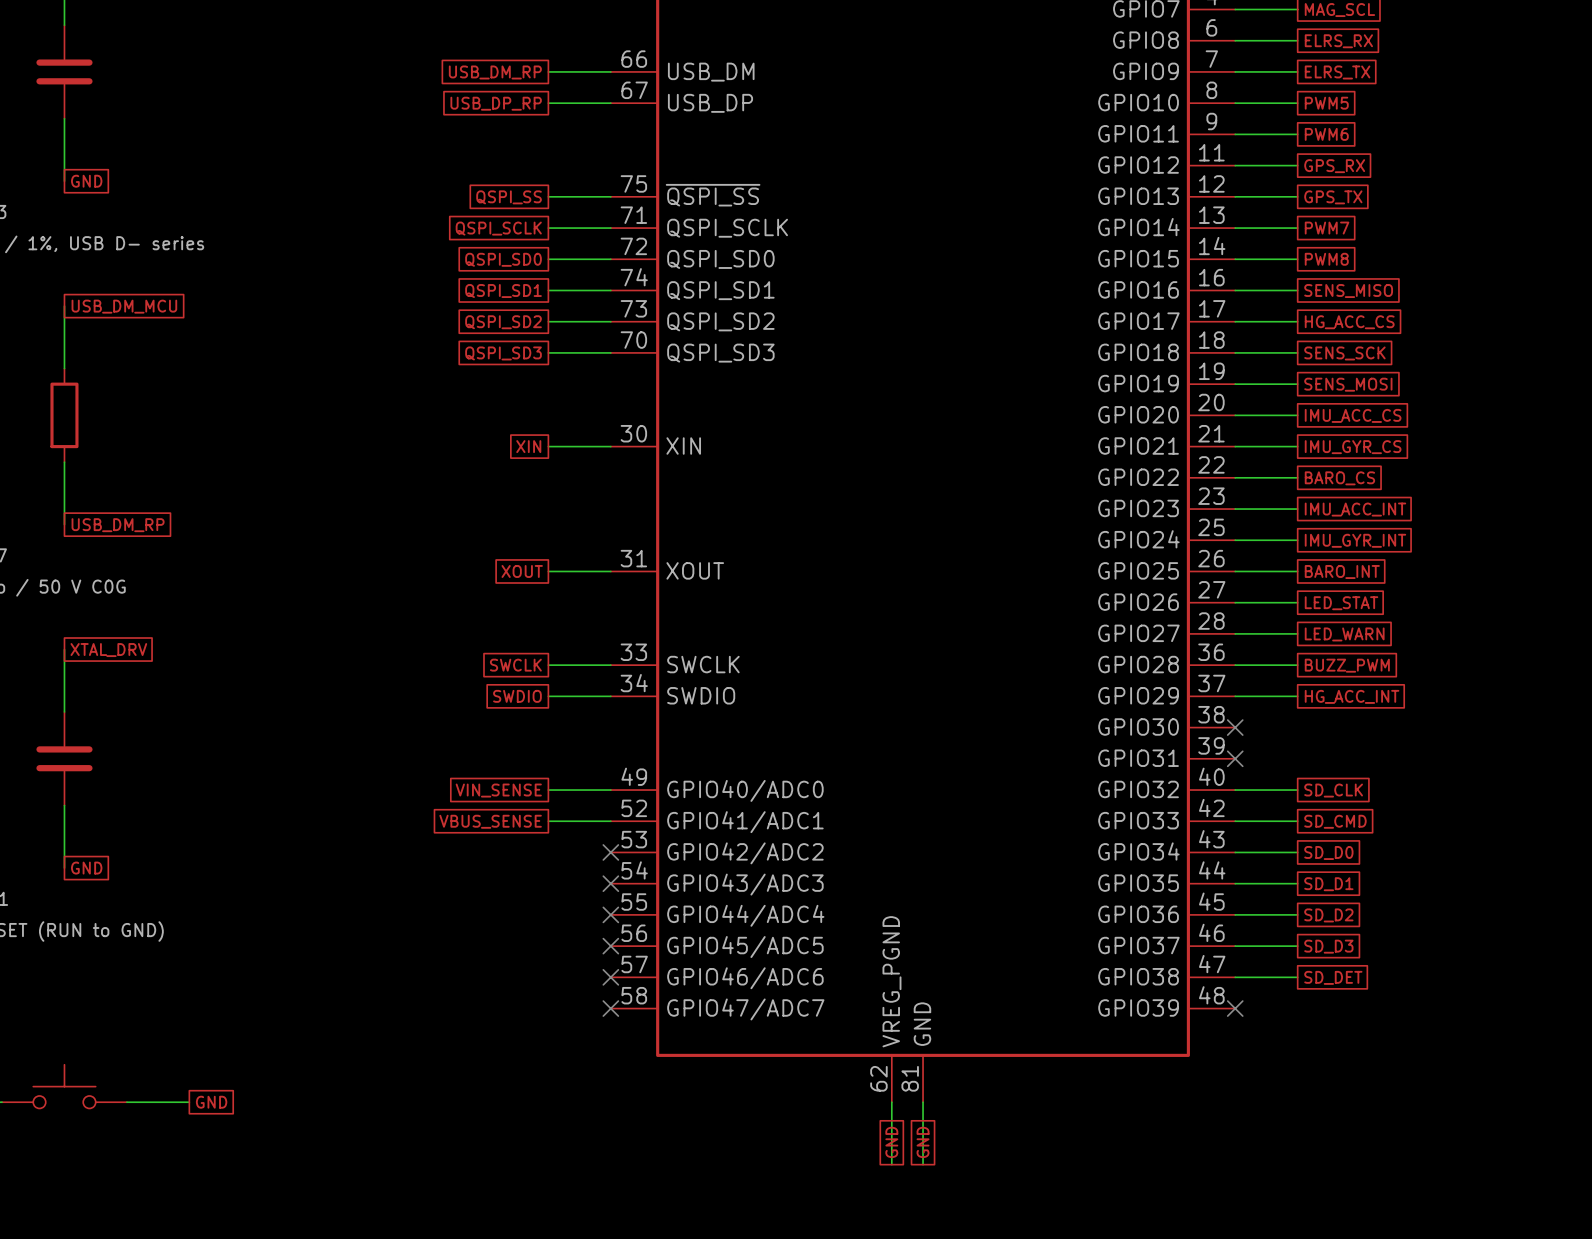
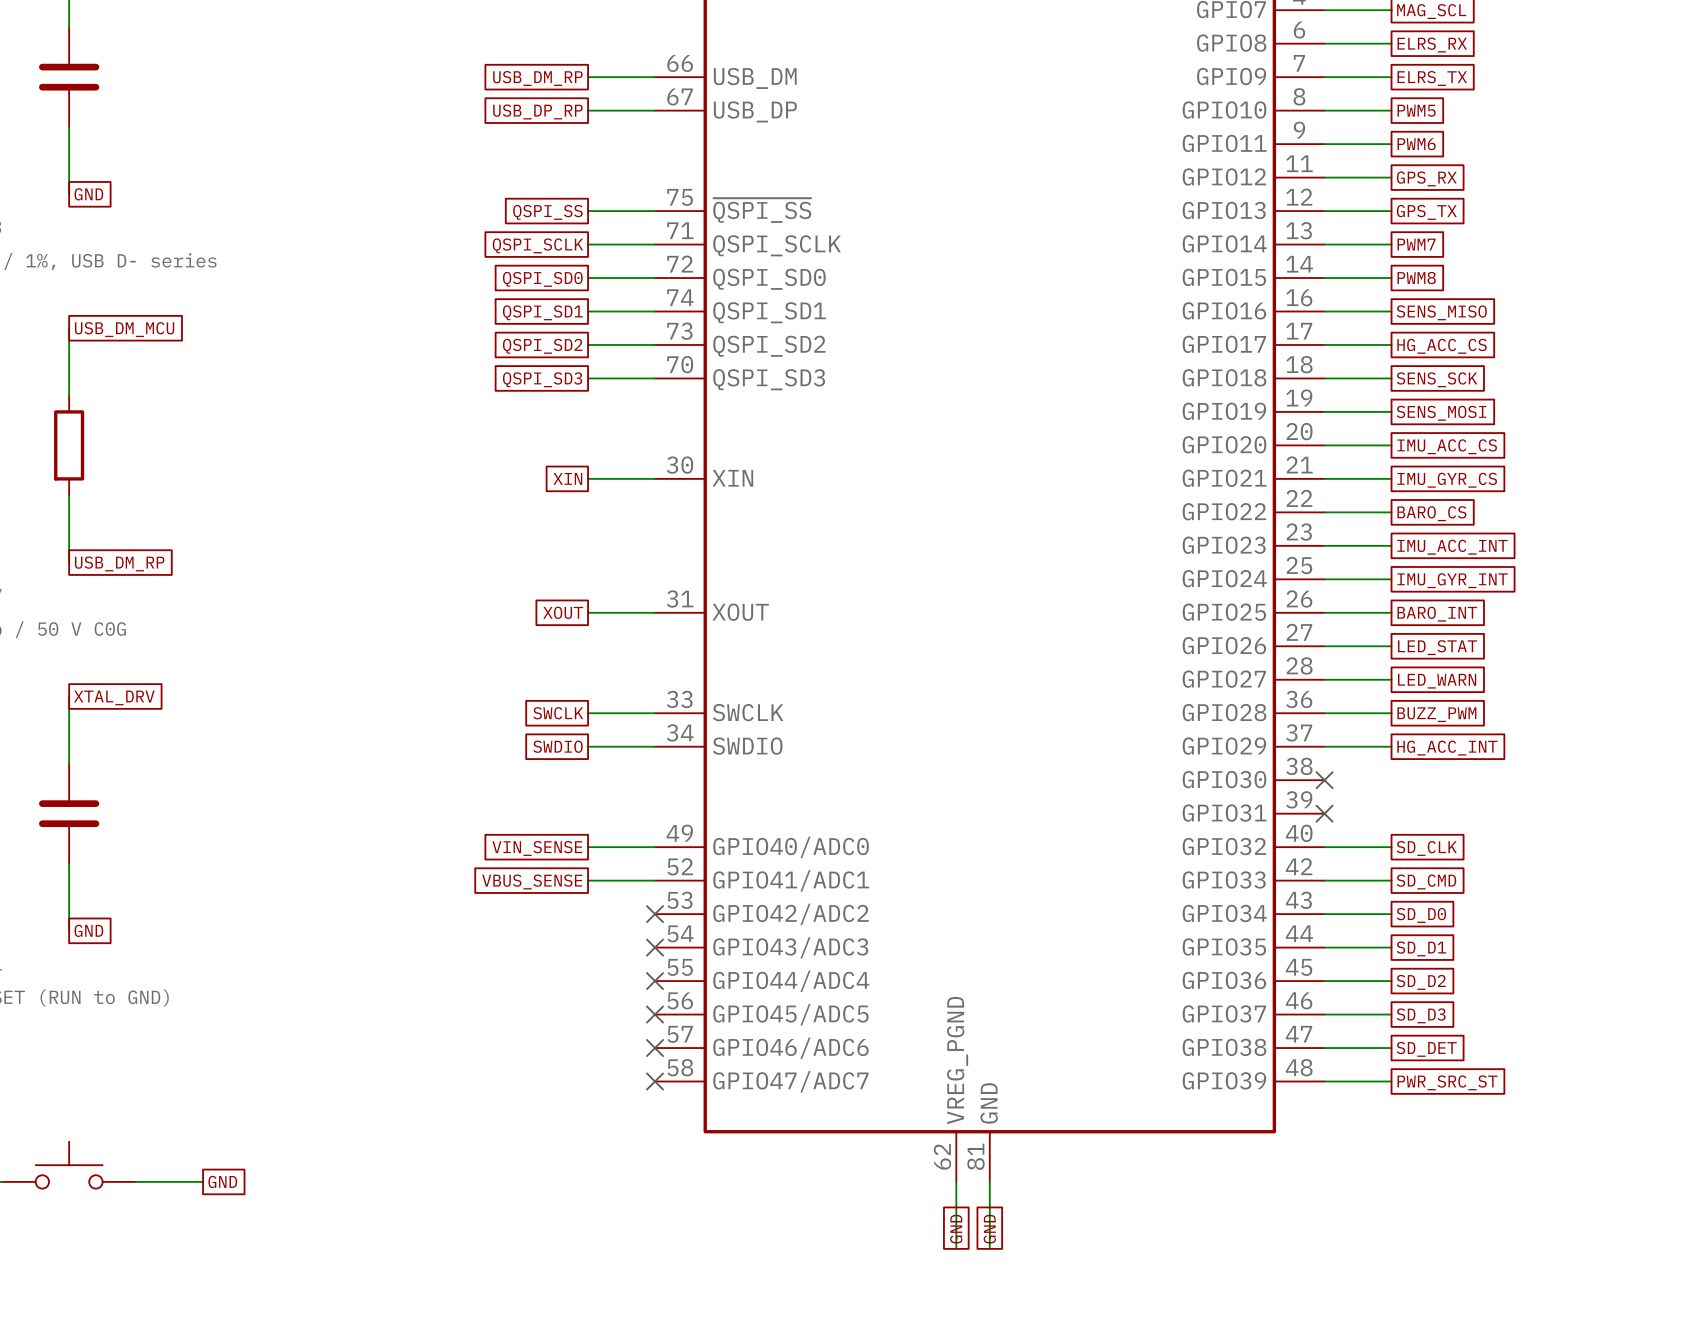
wire: none -> (1324, 1081) (1391, 1081)
no-connect mark: (1235, 1008) -> none
global label: none -> PWR_SRC_ST (1447, 1082)

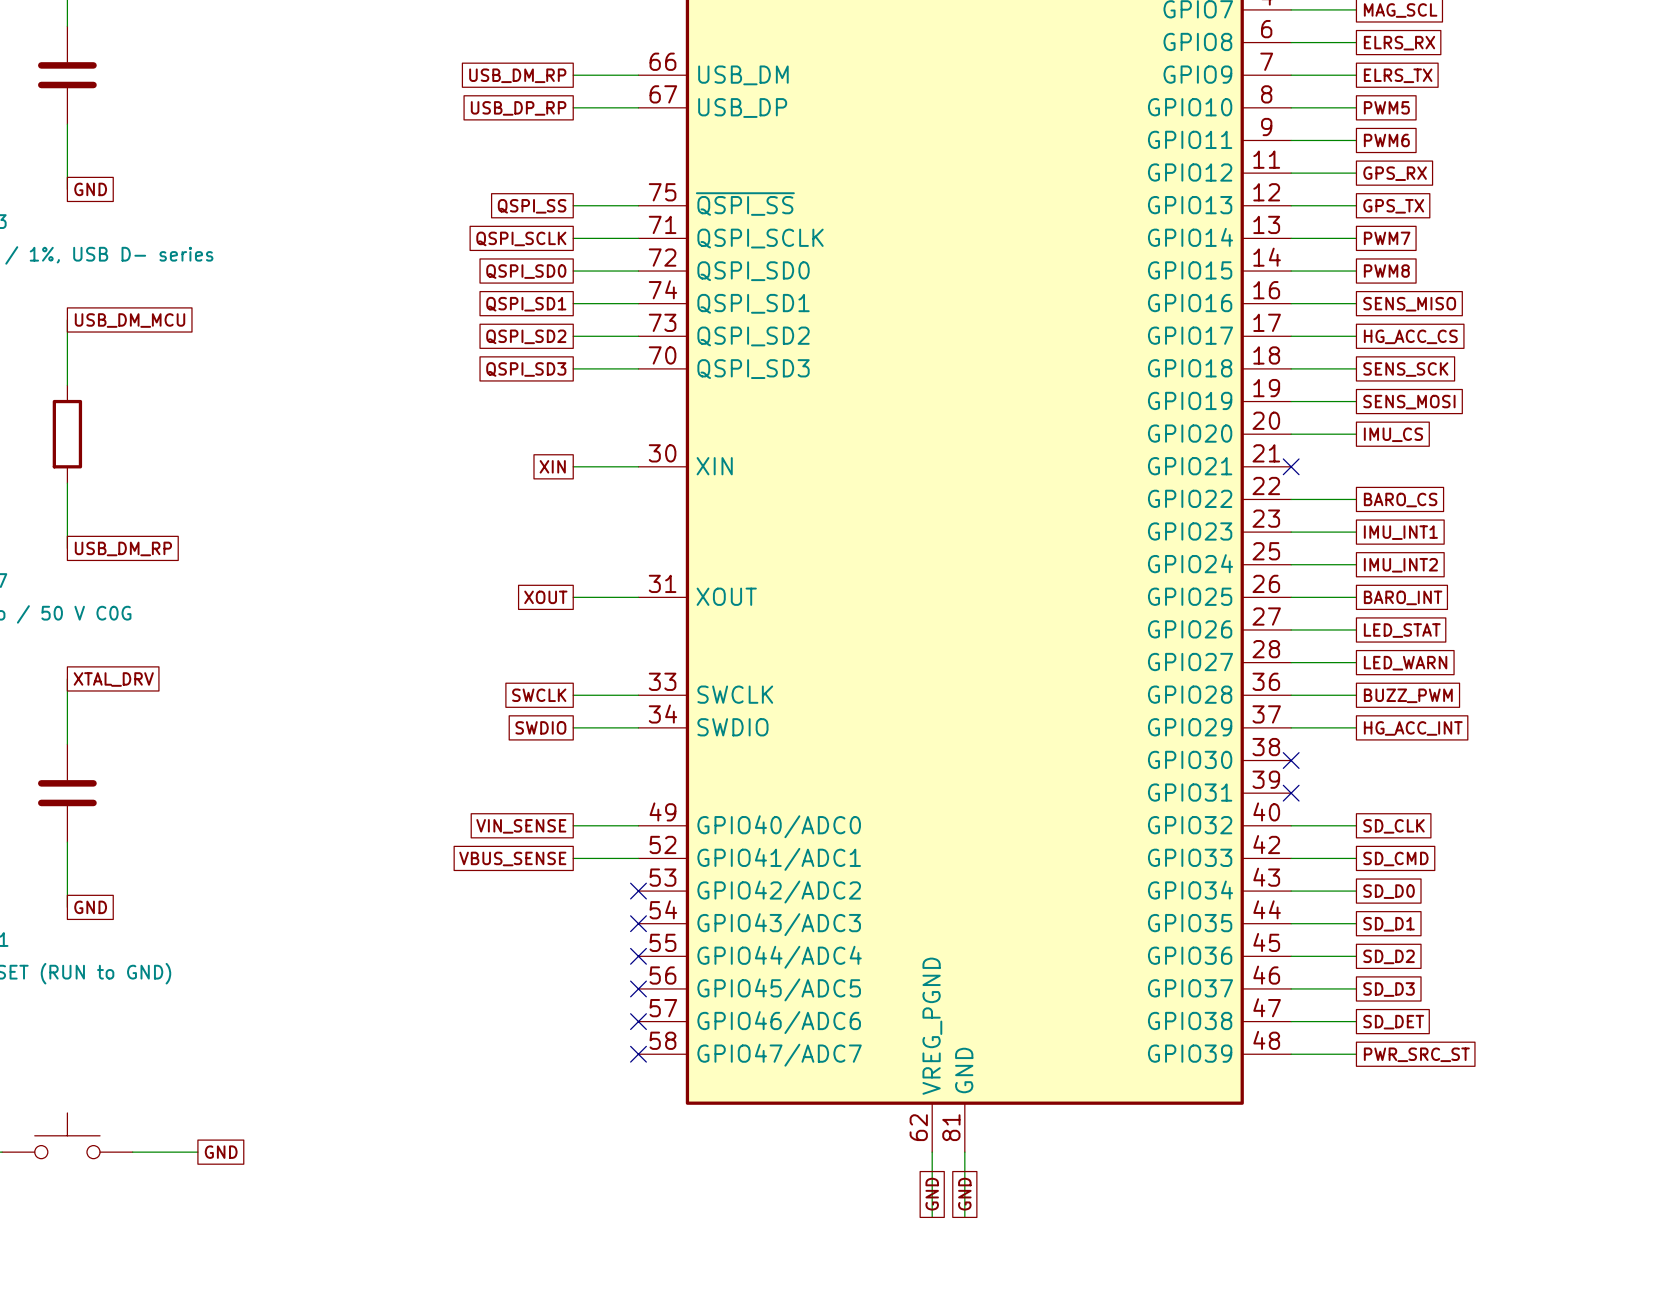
global label: IMU_ACC_CS (1447, 446) -> IMU_CS (1393, 434)
wire: (1324, 478) (1391, 478) -> none
no-connect mark: none -> (1291, 466)
global label: IMU_GYR_CS (1447, 480) -> none
global label: IMU_ACC_INT (1452, 547) -> IMU_INT1 (1400, 532)
global label: IMU_GYR_INT (1452, 580) -> IMU_INT2 (1400, 565)

